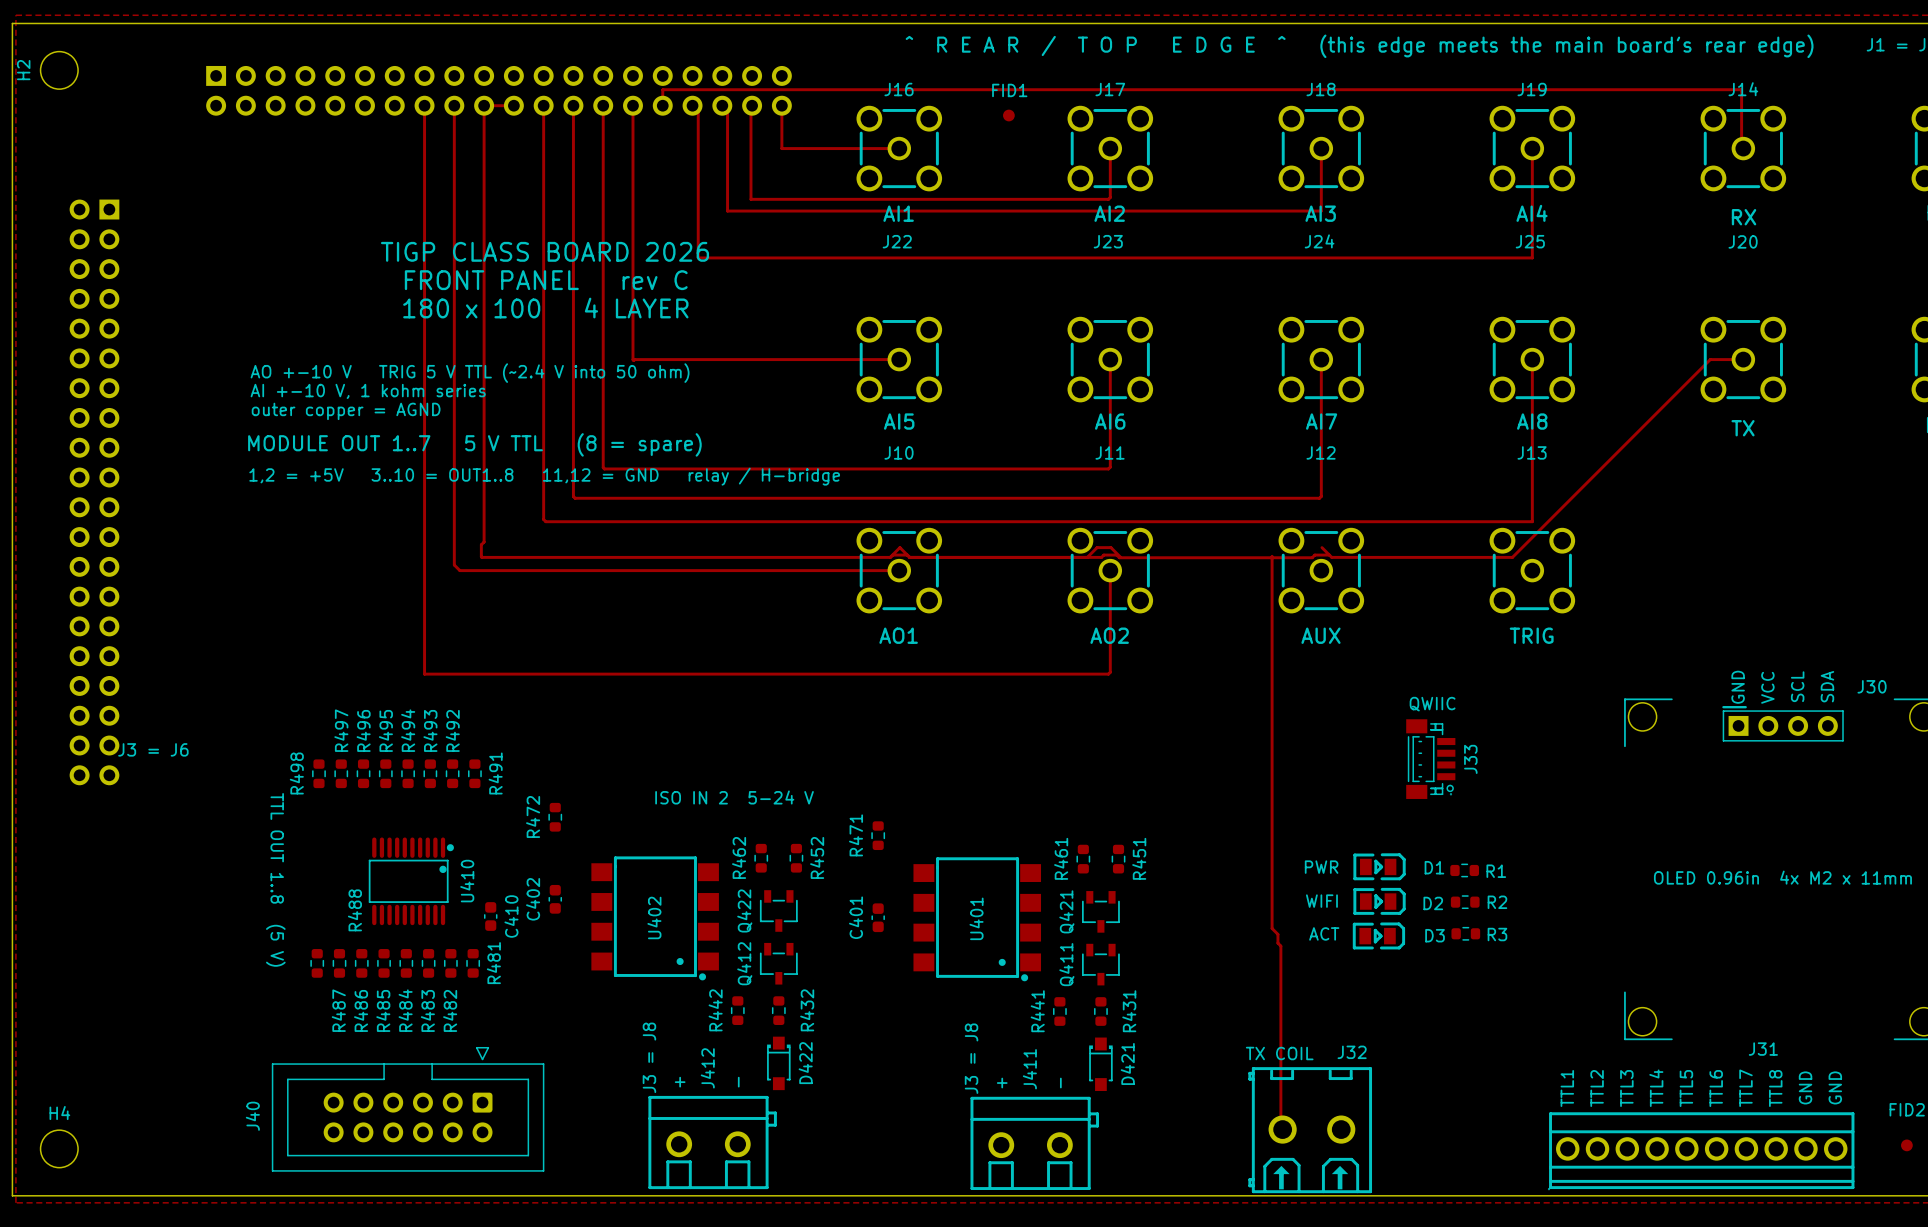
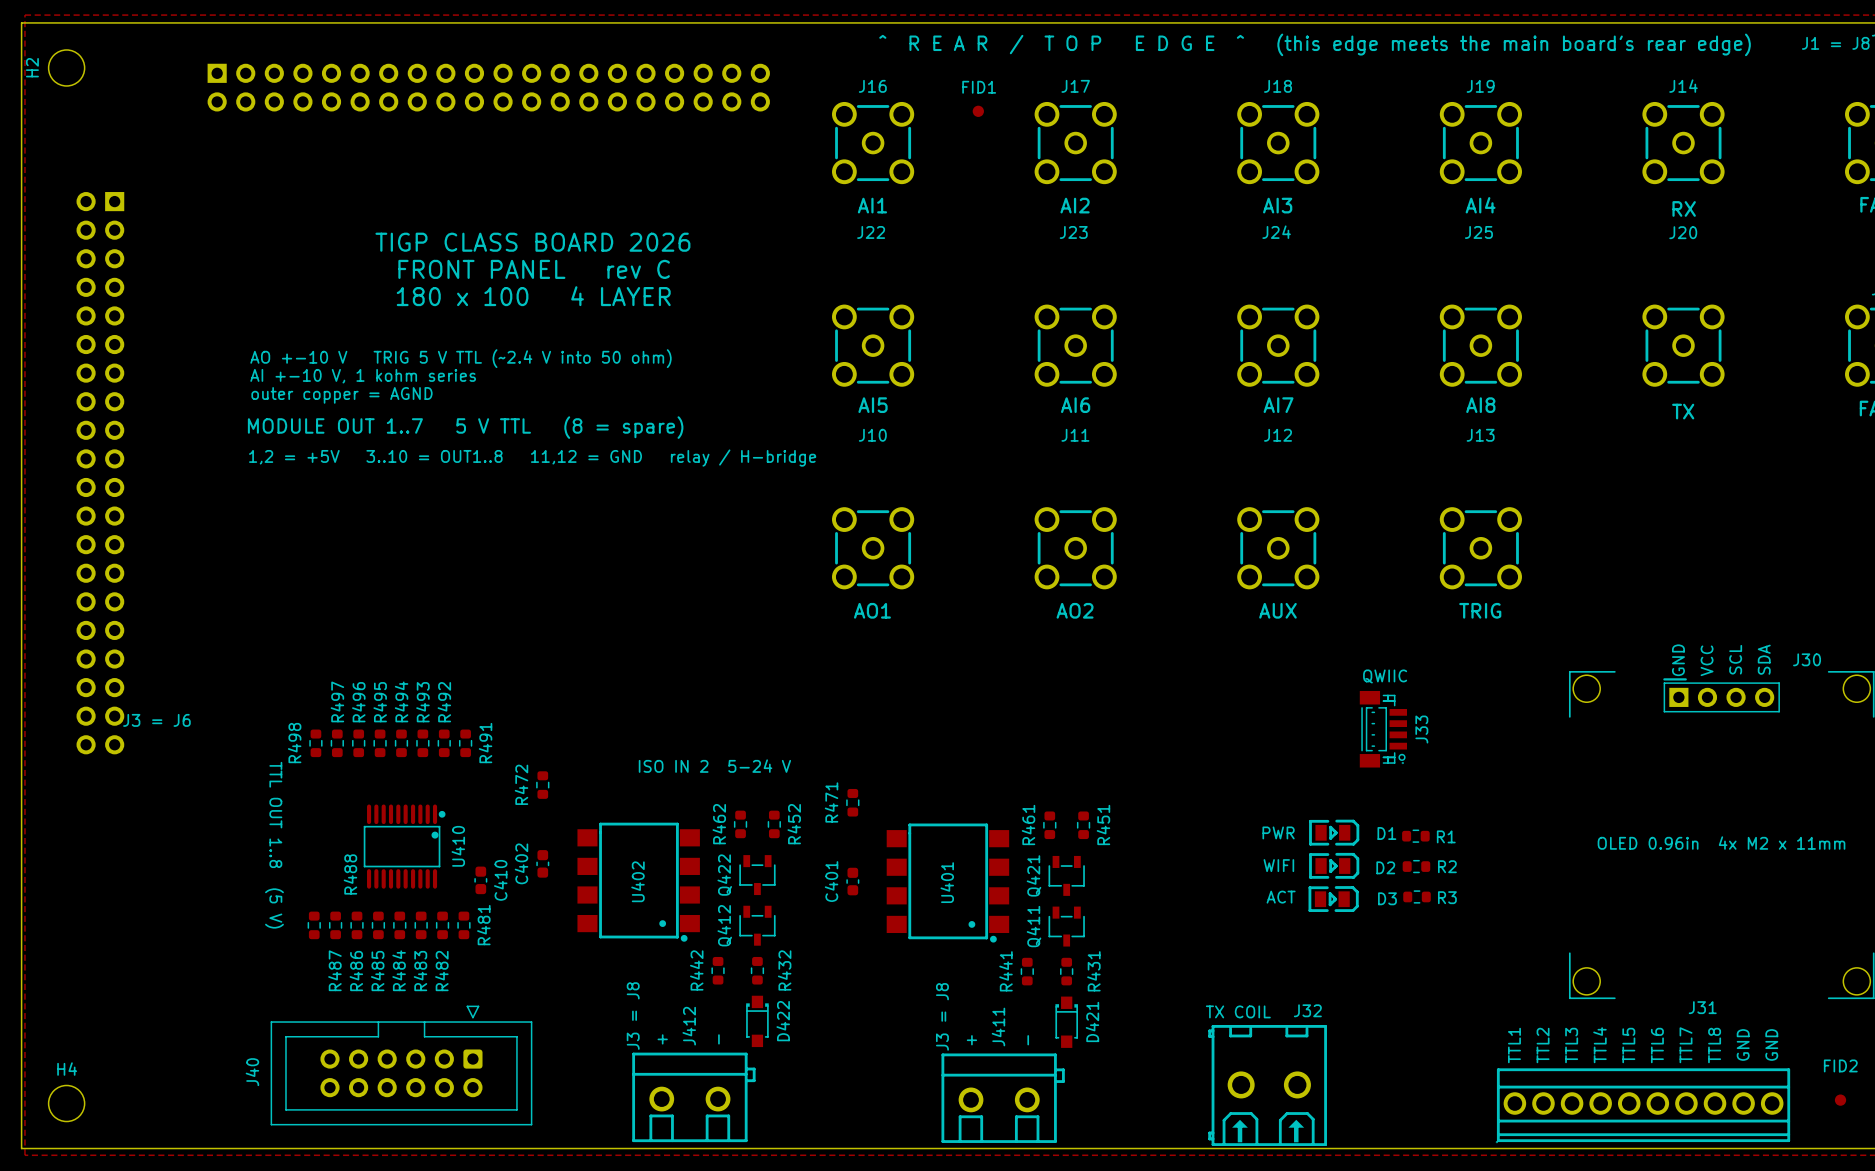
track: (424, 105) (424, 674) (1108, 674) (1110, 672) (1110, 570) -> none
track: (454, 105) (454, 565) (459, 570) (899, 570) -> none
track: (513, 105) (484, 105) (484, 542) (481, 544) (481, 557) (890, 557) (899, 547) (909, 557) (1101, 557) (1103, 555) (1116, 555) (1119, 557) (1312, 557) (1314, 555) (1329, 555) -> none
track: (543, 105) (543, 519) (545, 521) (1532, 521) (1532, 359) -> none
track: (573, 105) (573, 496) (575, 498) (1319, 498) (1321, 496) (1321, 359) -> none
track: (603, 105) (604, 468) (1108, 468) (1110, 467) (1110, 359) -> none
track: (632, 105) (633, 360) (899, 359) -> none
track: (662, 105) (663, 89) (1741, 89) (1741, 146) (1743, 148) -> none
track: (692, 105) (698, 111) (698, 257) (1532, 257) (1532, 148) (1536, 152) -> none
track: (722, 105) (727, 110) (727, 211) (1321, 211) (1321, 148) -> none
track: (752, 105) (750, 199) (1108, 199) (1110, 197) (1110, 148) -> none
track: (781, 105) (781, 148) (899, 148) -> none
track: (1743, 359) (1710, 359) (1512, 557) (1331, 557) (1321, 547) -> none
track: (907, 555) (892, 555) (890, 557) -> none
track: (1272, 556) (1272, 928) (1277, 934) (1277, 943) (1280, 946) (1280, 1116) -> none
track: (1087, 557) (1097, 547) (1110, 547) (1120, 557) -> none

